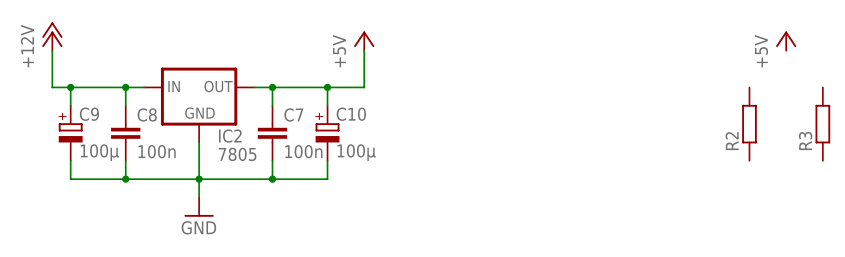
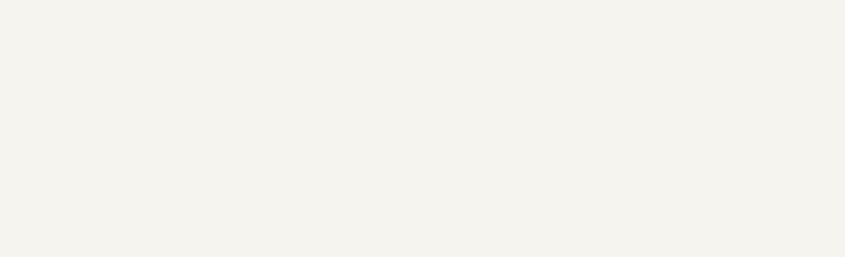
power symbol: +12V (52, 36) -> none
power symbol: +5V (364, 41) -> none
power symbol: +5V (786, 41) -> none
wire: (52, 50) (52, 87) (144, 87) -> none
wire: (364, 50) (364, 87) (254, 87) -> none
wire: (70, 87) (70, 105) -> none
junction: (70, 87) -> none
wire: (125, 87) (125, 105) -> none
junction: (125, 87) -> none
wire: (272, 87) (272, 105) -> none
junction: (272, 87) -> none
wire: (327, 87) (327, 105) -> none
junction: (327, 87) -> none
IC2: 7805 (199, 105) -> none
R2: (749, 124) -> none
R3: (822, 124) -> none
C9: 100µ (70, 133) -> none
C8: 100n (125, 133) -> none
C7: 100n (272, 133) -> none
C10: 100µ (327, 133) -> none
wire: (199, 142) (199, 197) -> none
wire: (70, 160) (70, 179) (327, 179) (327, 160) -> none
wire: (125, 160) (125, 179) -> none
wire: (272, 160) (272, 179) -> none
junction: (125, 179) -> none
junction: (199, 179) -> none
junction: (272, 179) -> none
power symbol: GND (199, 207) -> none

